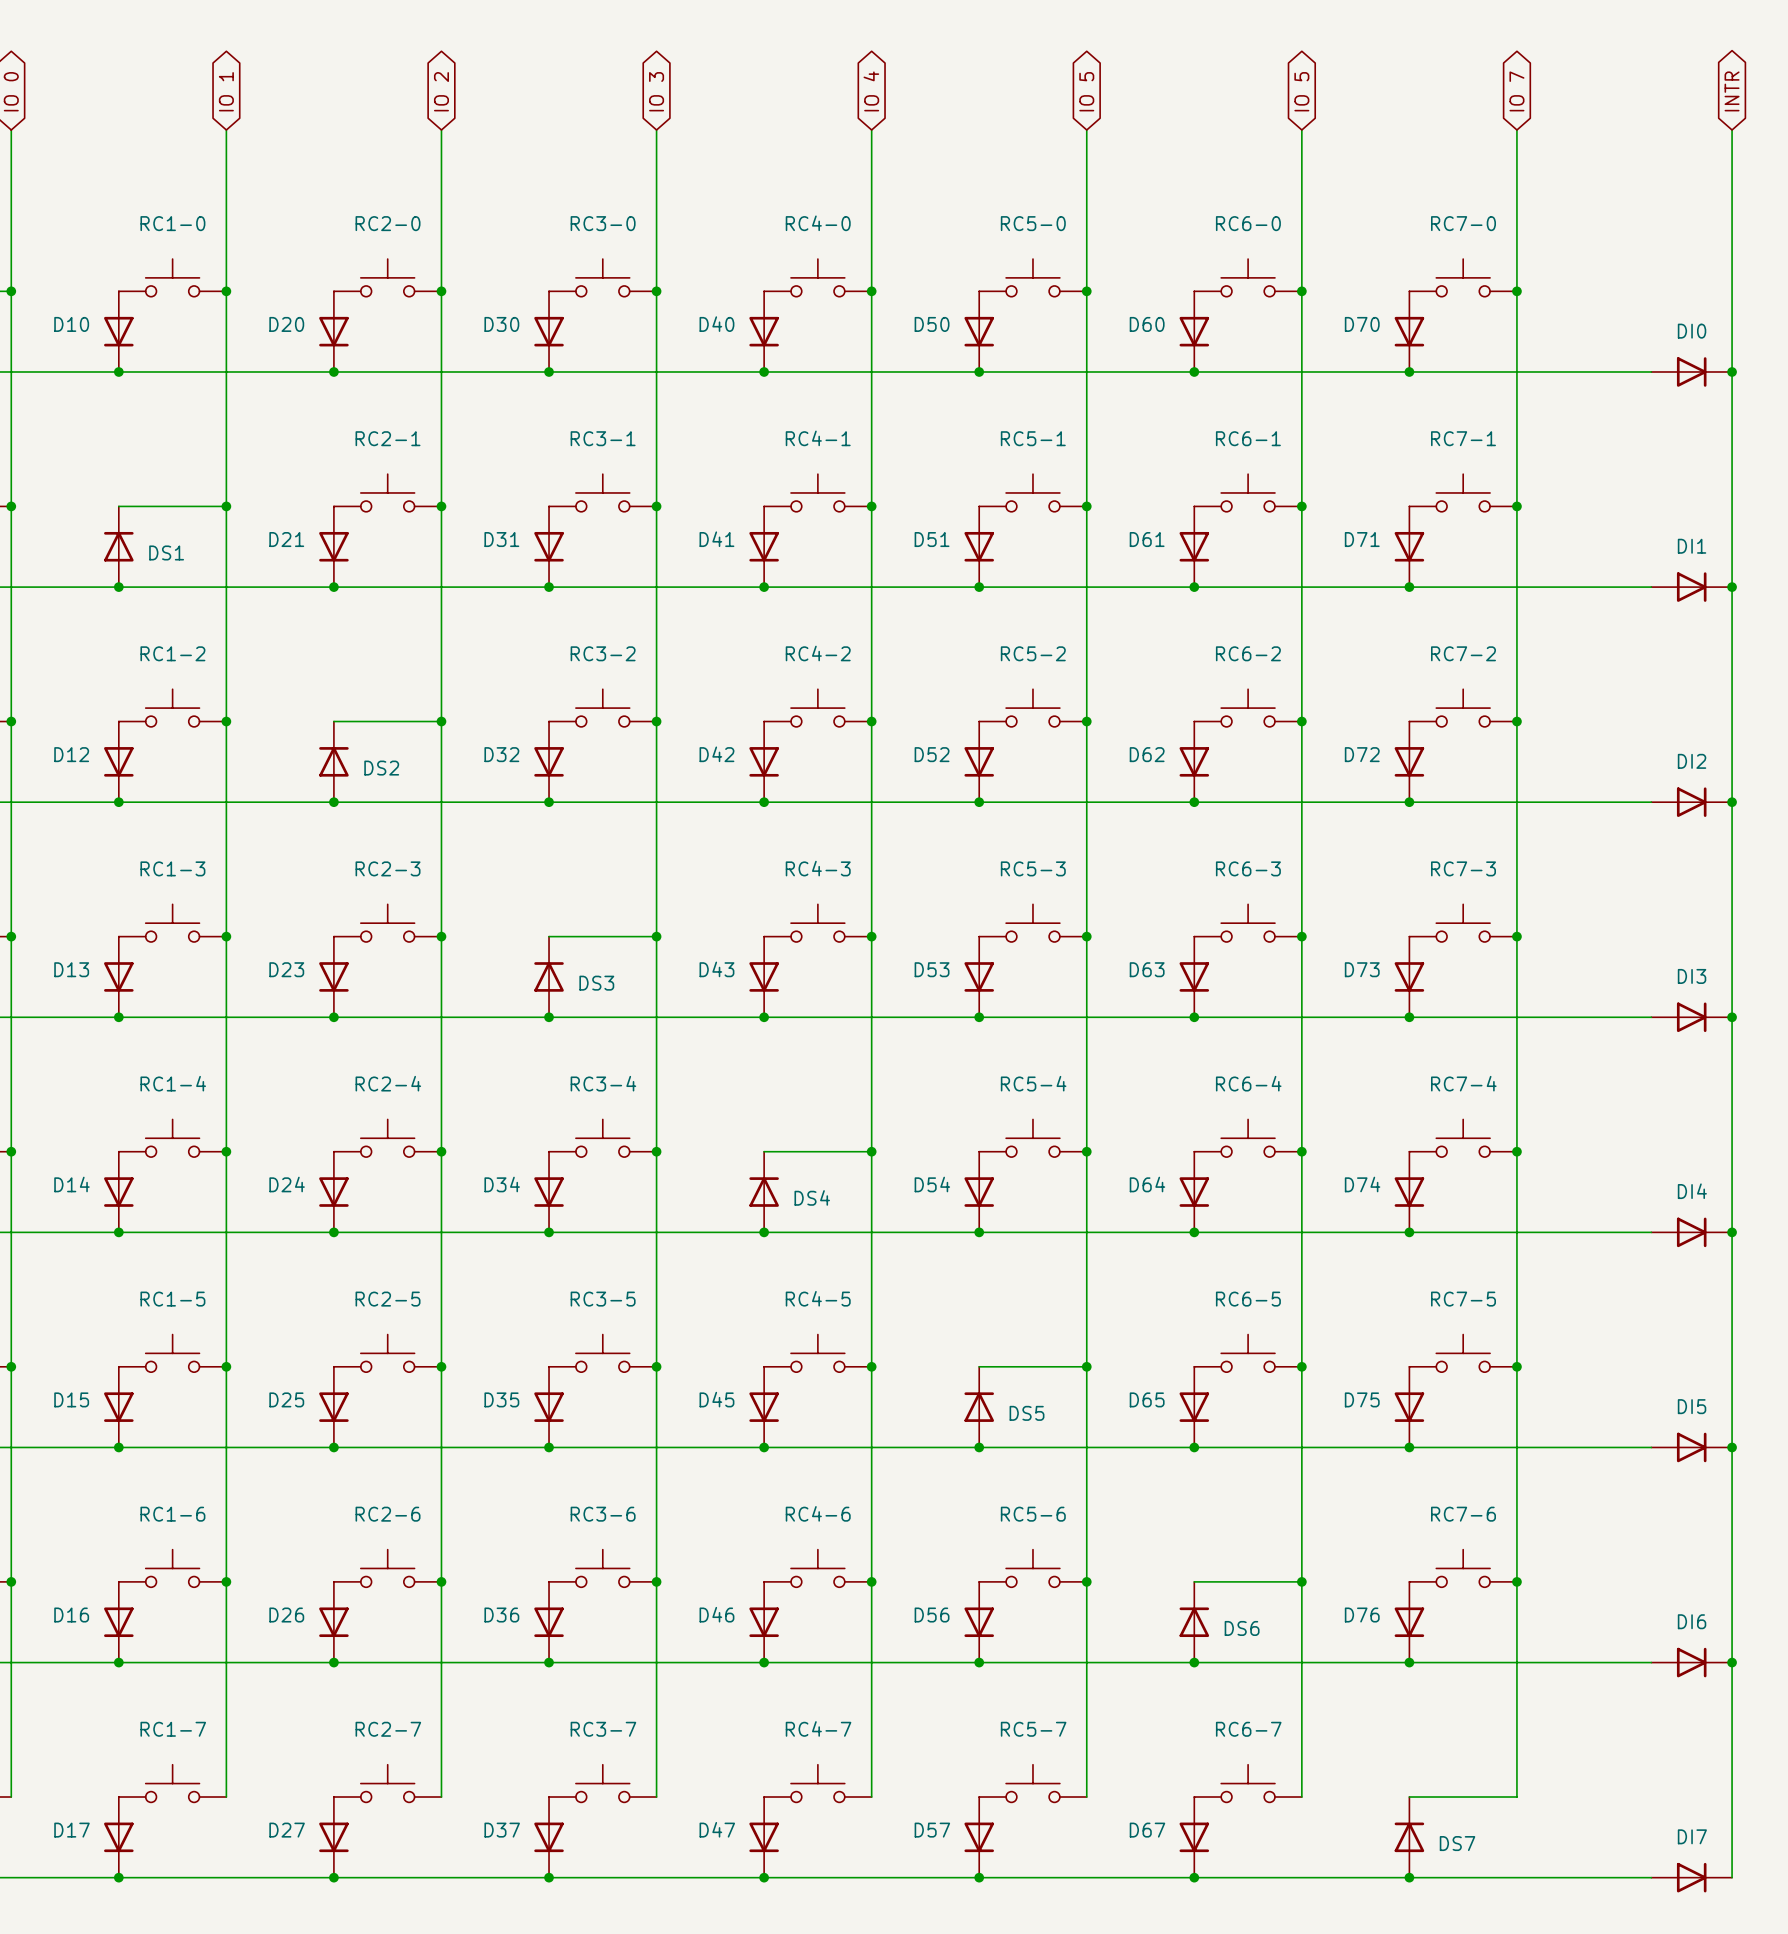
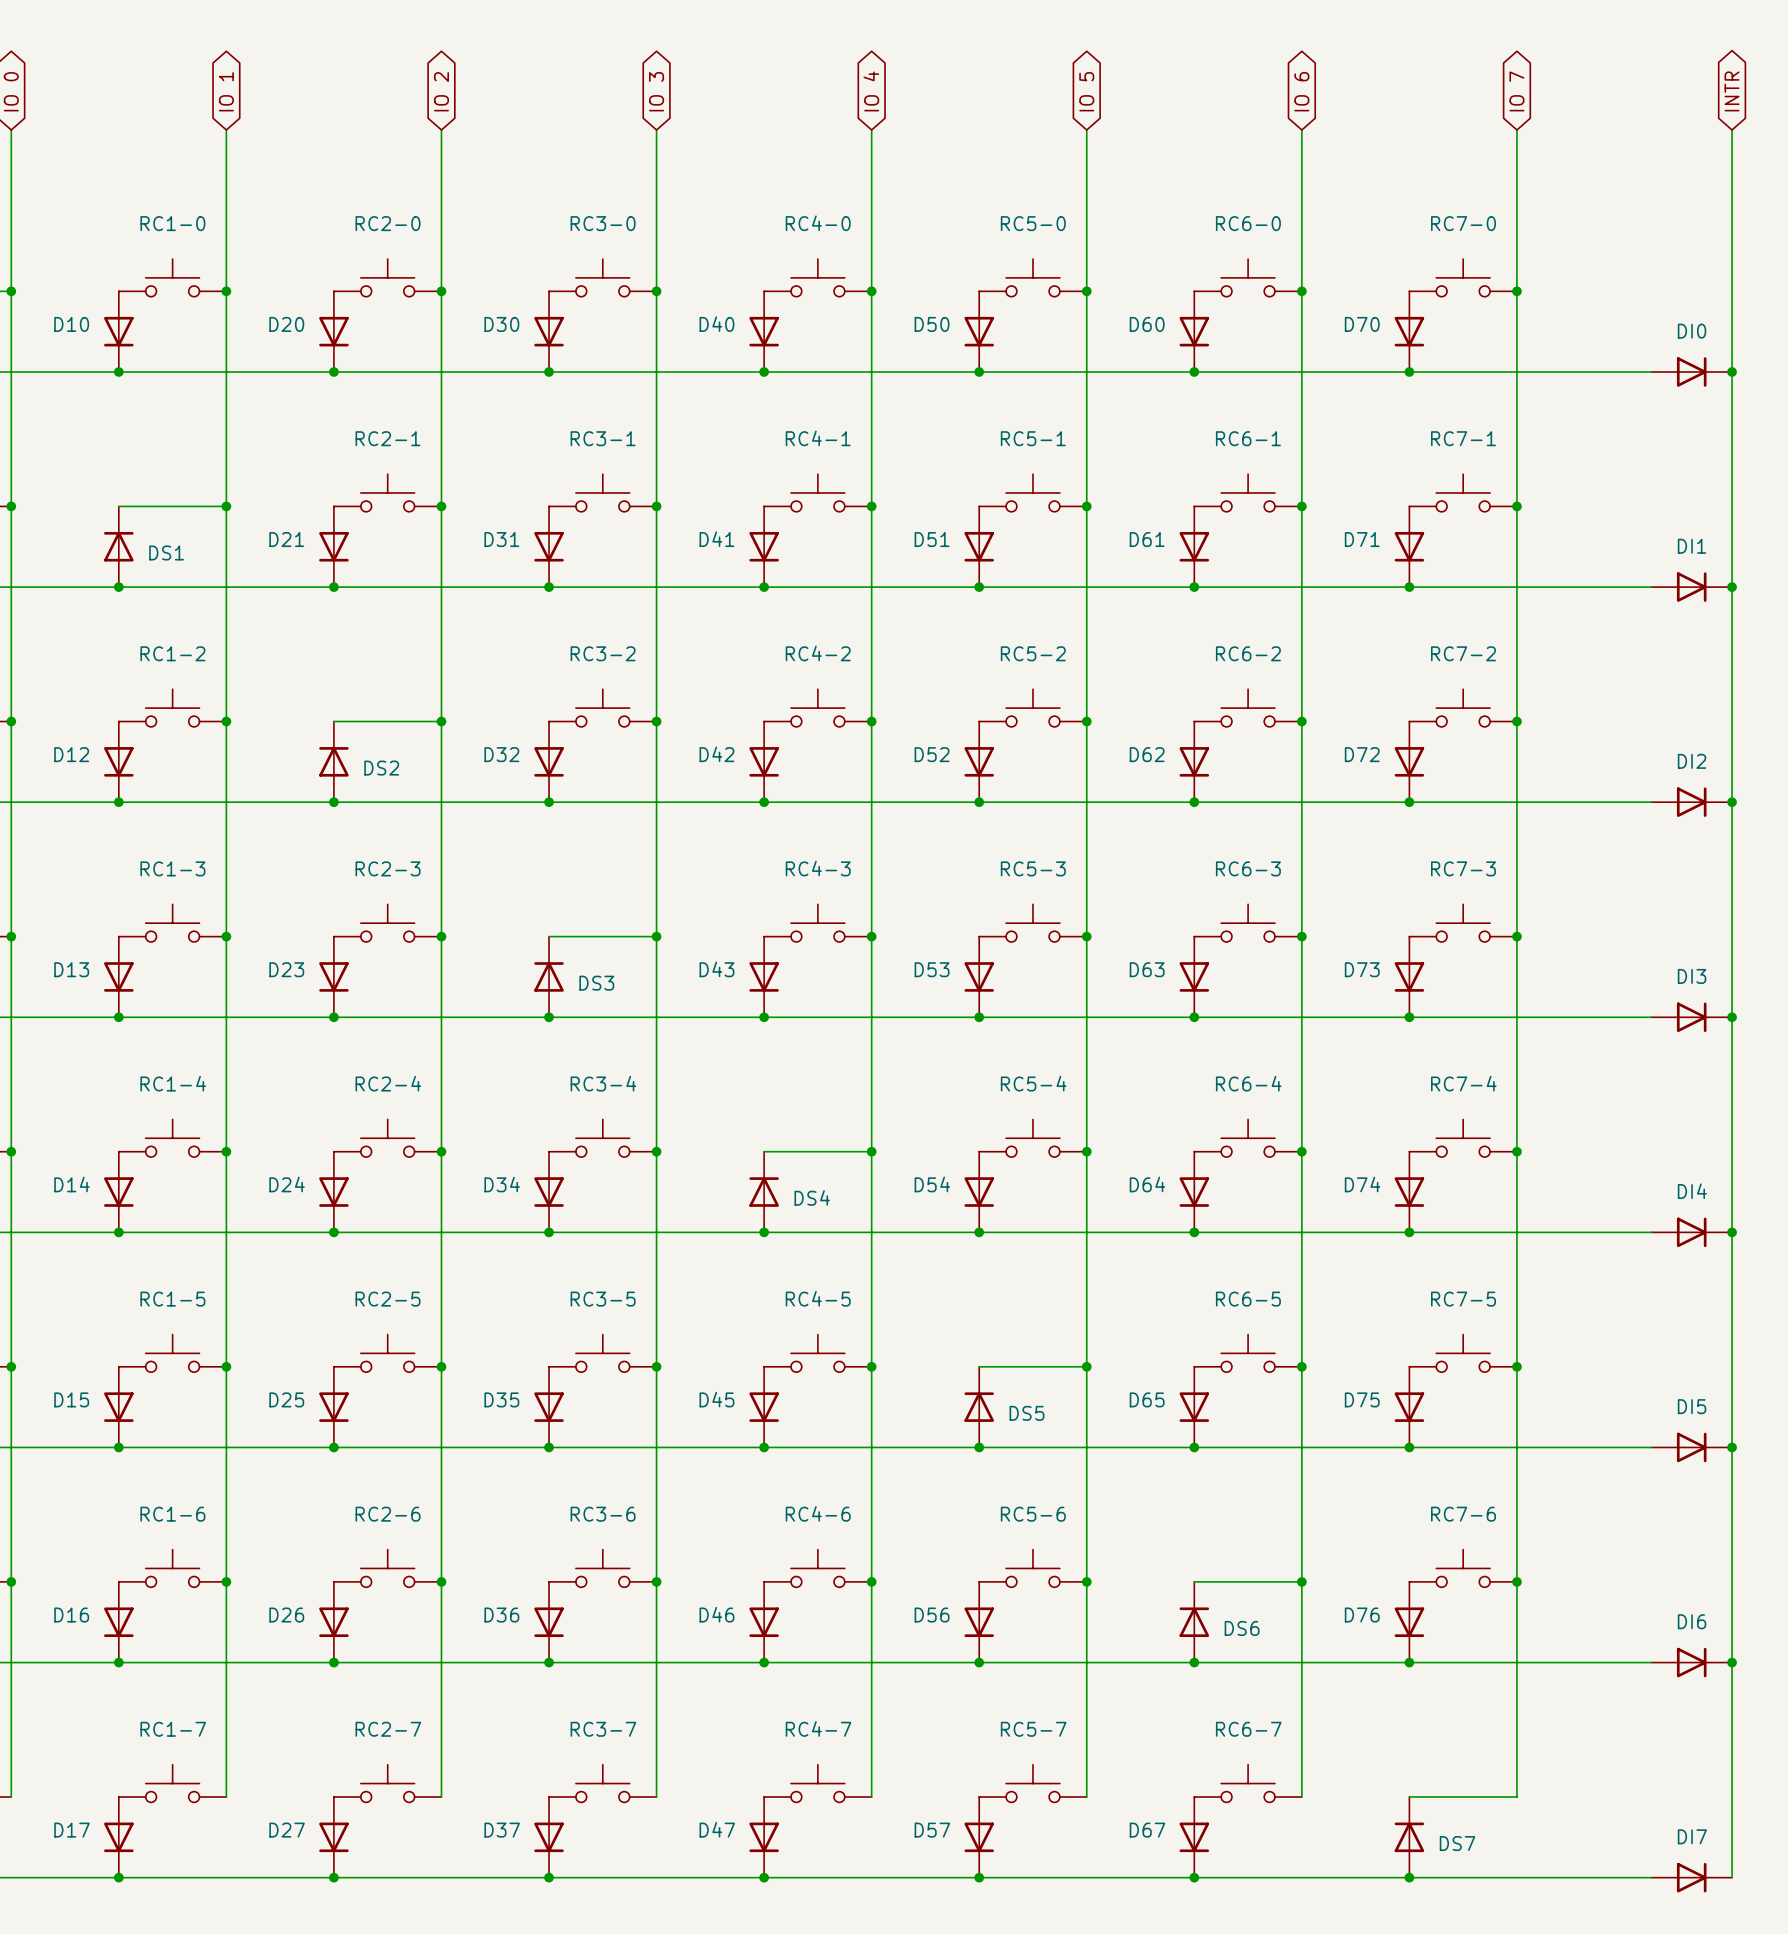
global label: IO 5 (1301, 91) -> IO 6 (1301, 91)

